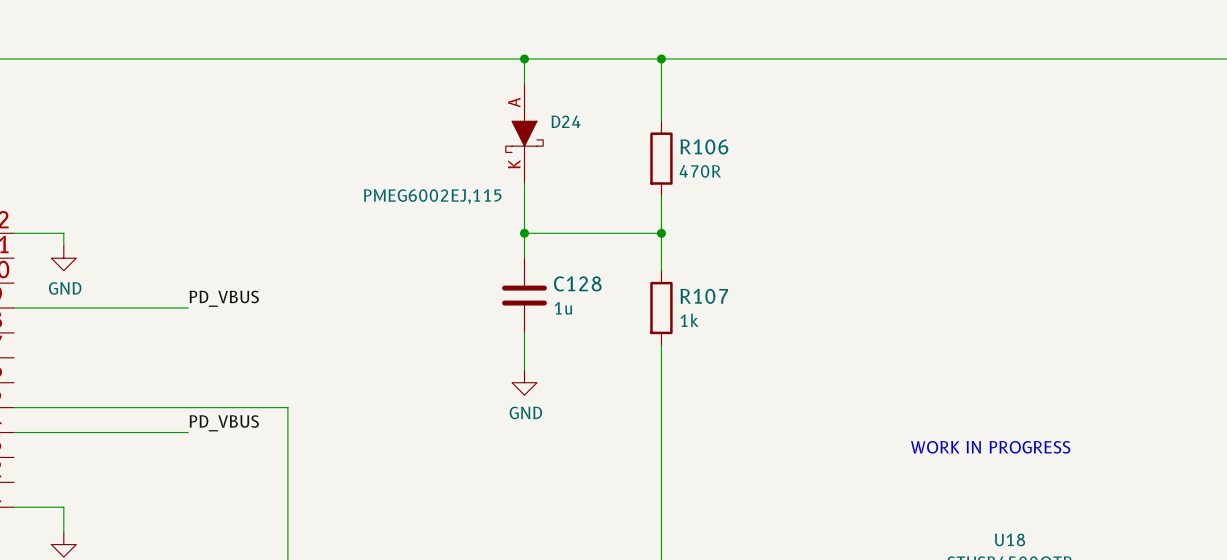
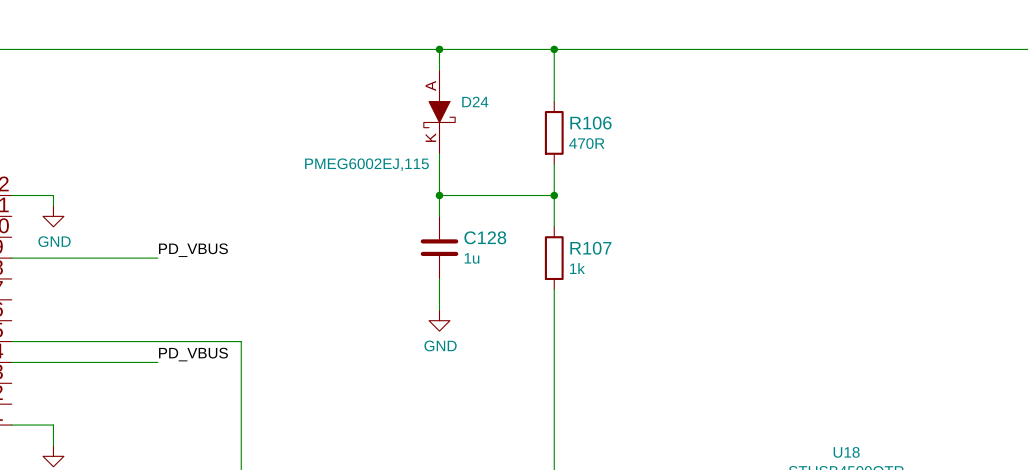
text: WORK IN PROGRESS (990, 447) -> none

